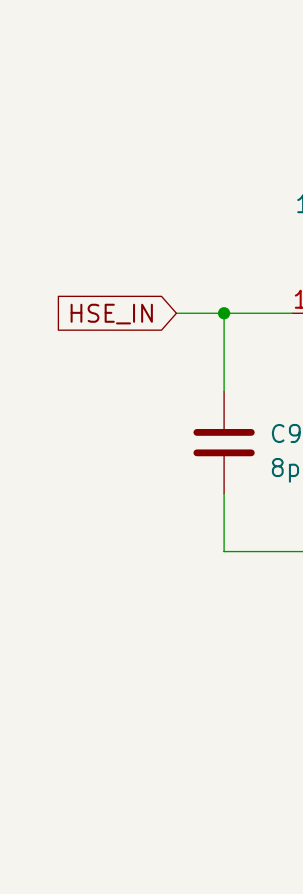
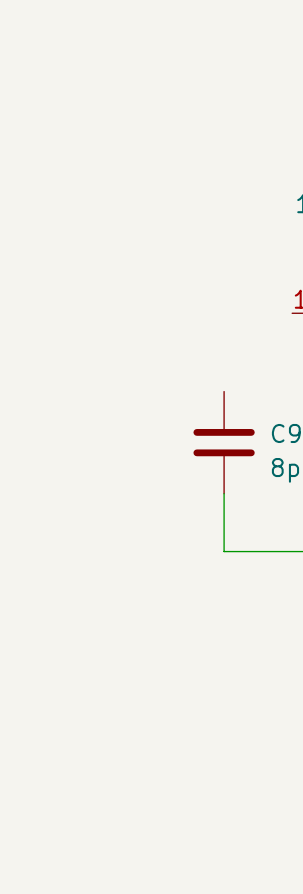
wire: (176, 313) (292, 313) -> none
wire: (224, 313) (224, 391) -> none
junction: (224, 313) -> none
global label: HSE_IN (111, 314) -> none

